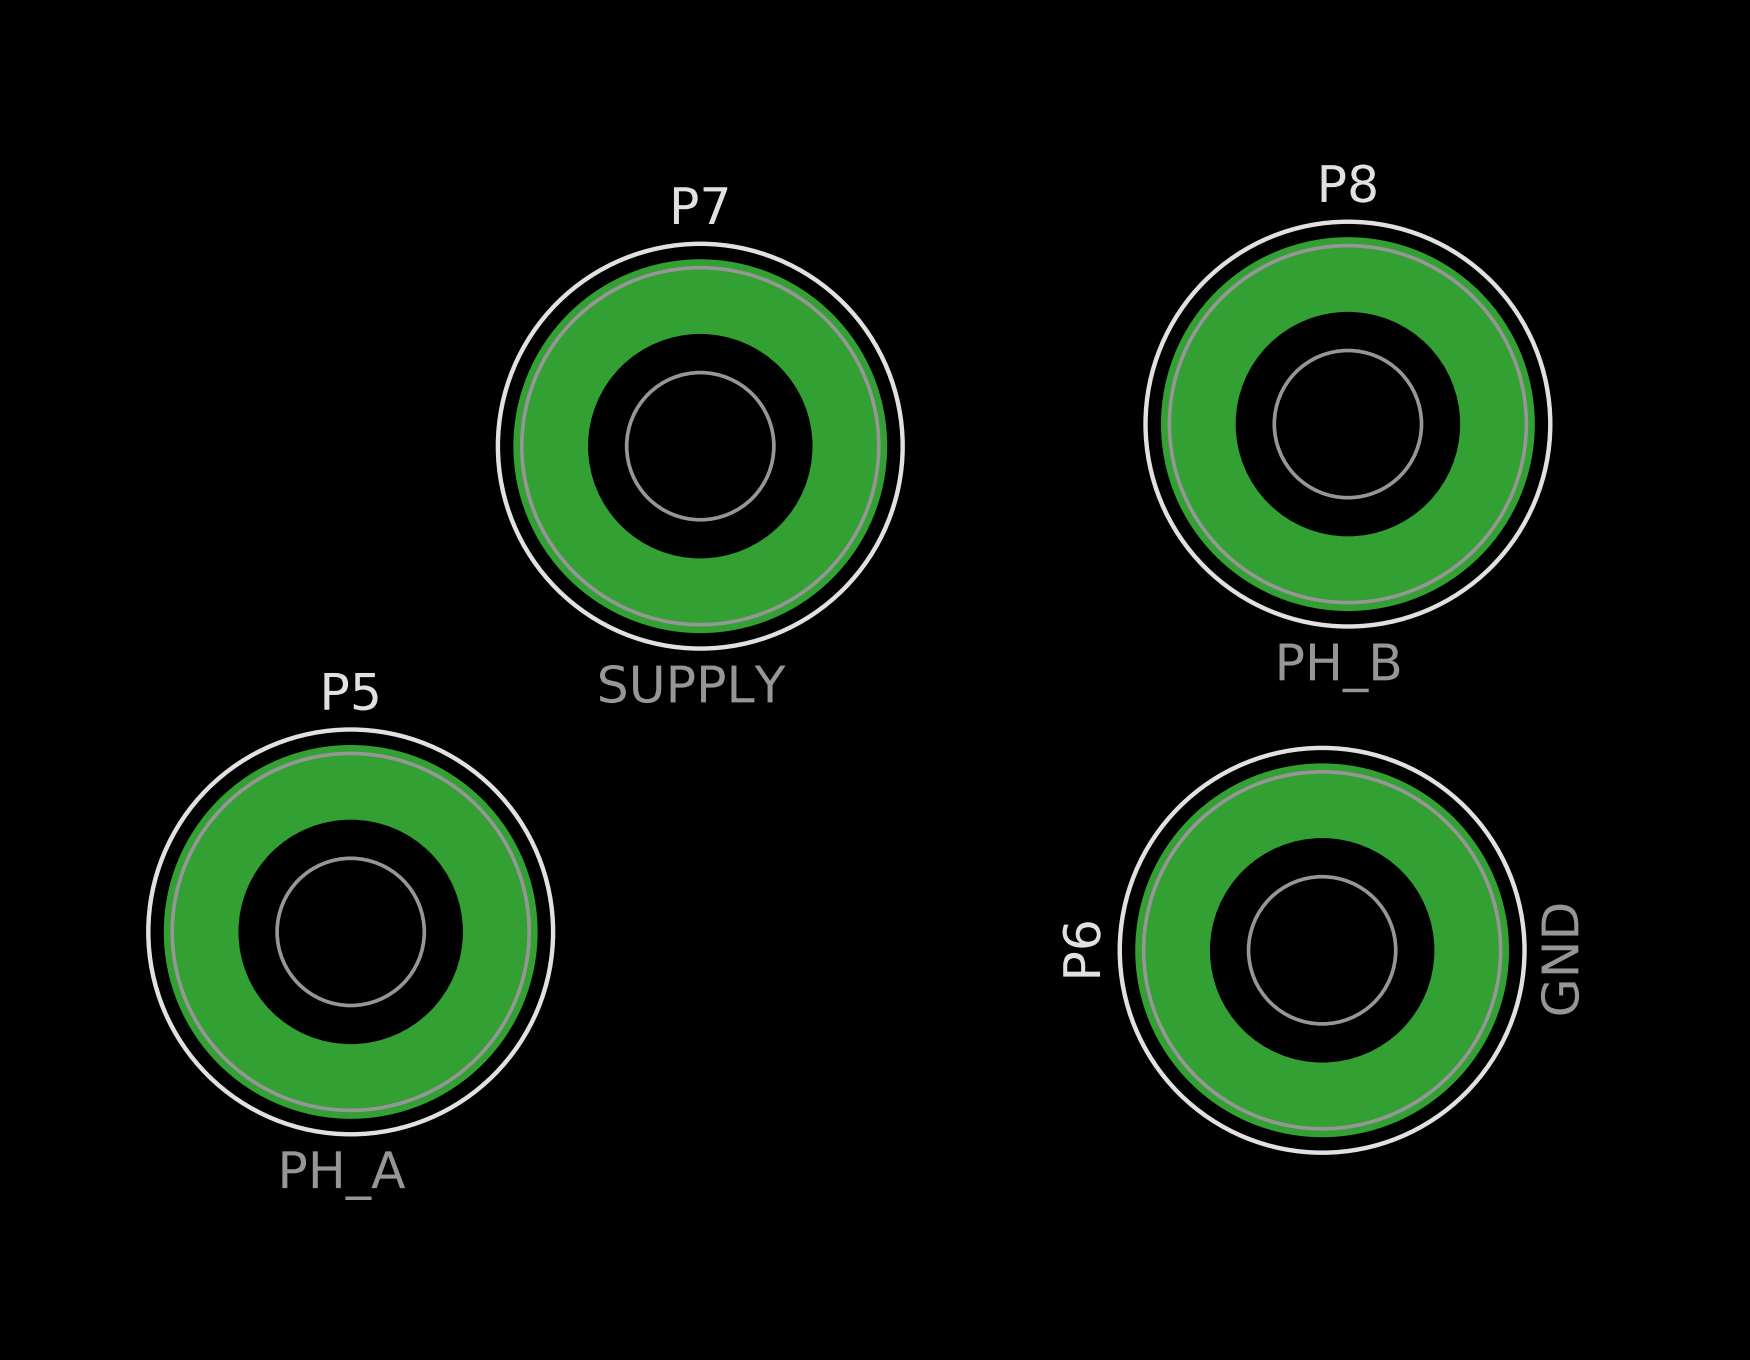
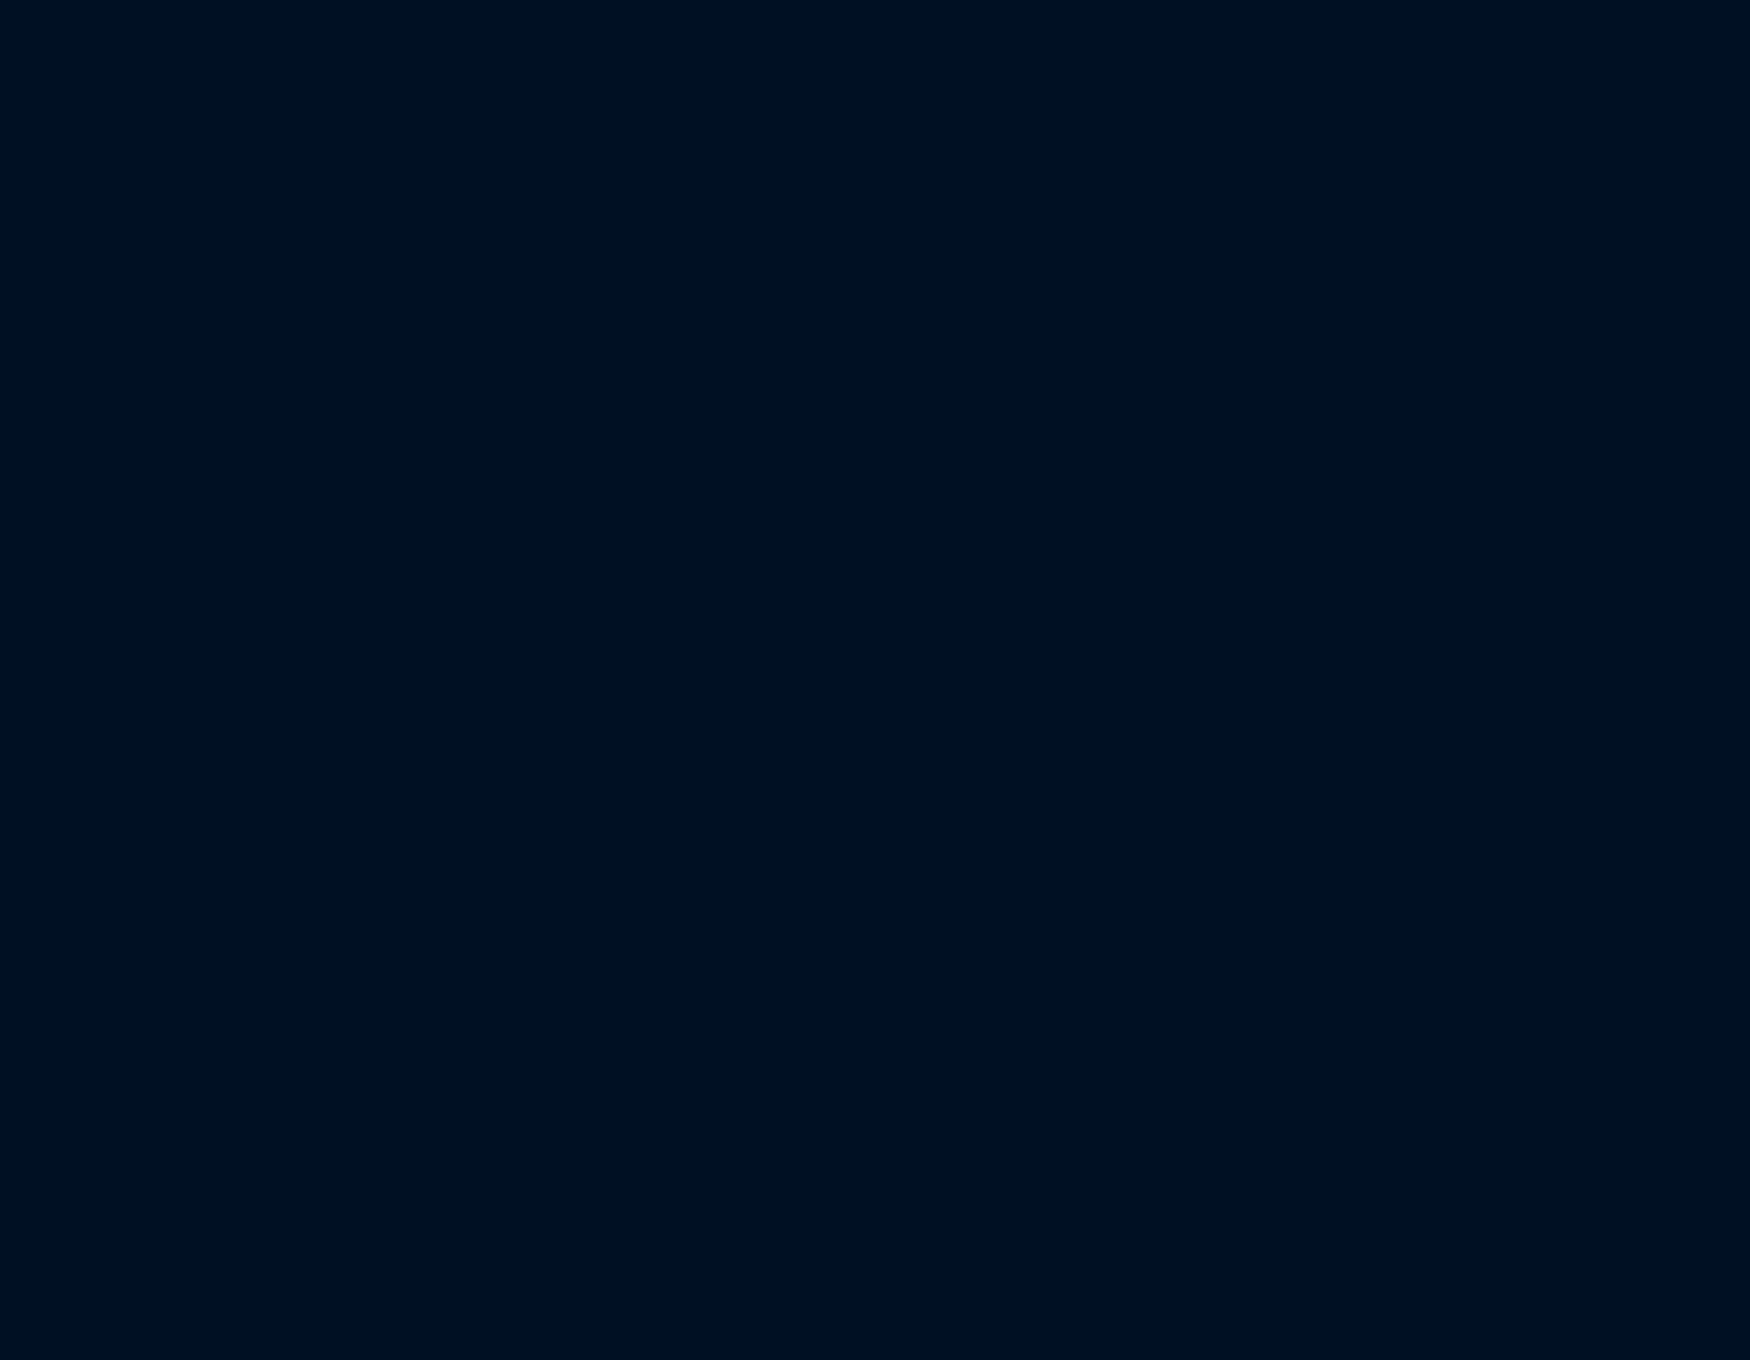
P8: PH_B (1347, 424) -> none
P7: SUPPLY (700, 446) -> none
P5: PH_A (350, 931) -> none
P6: GND (1322, 950) -> none

